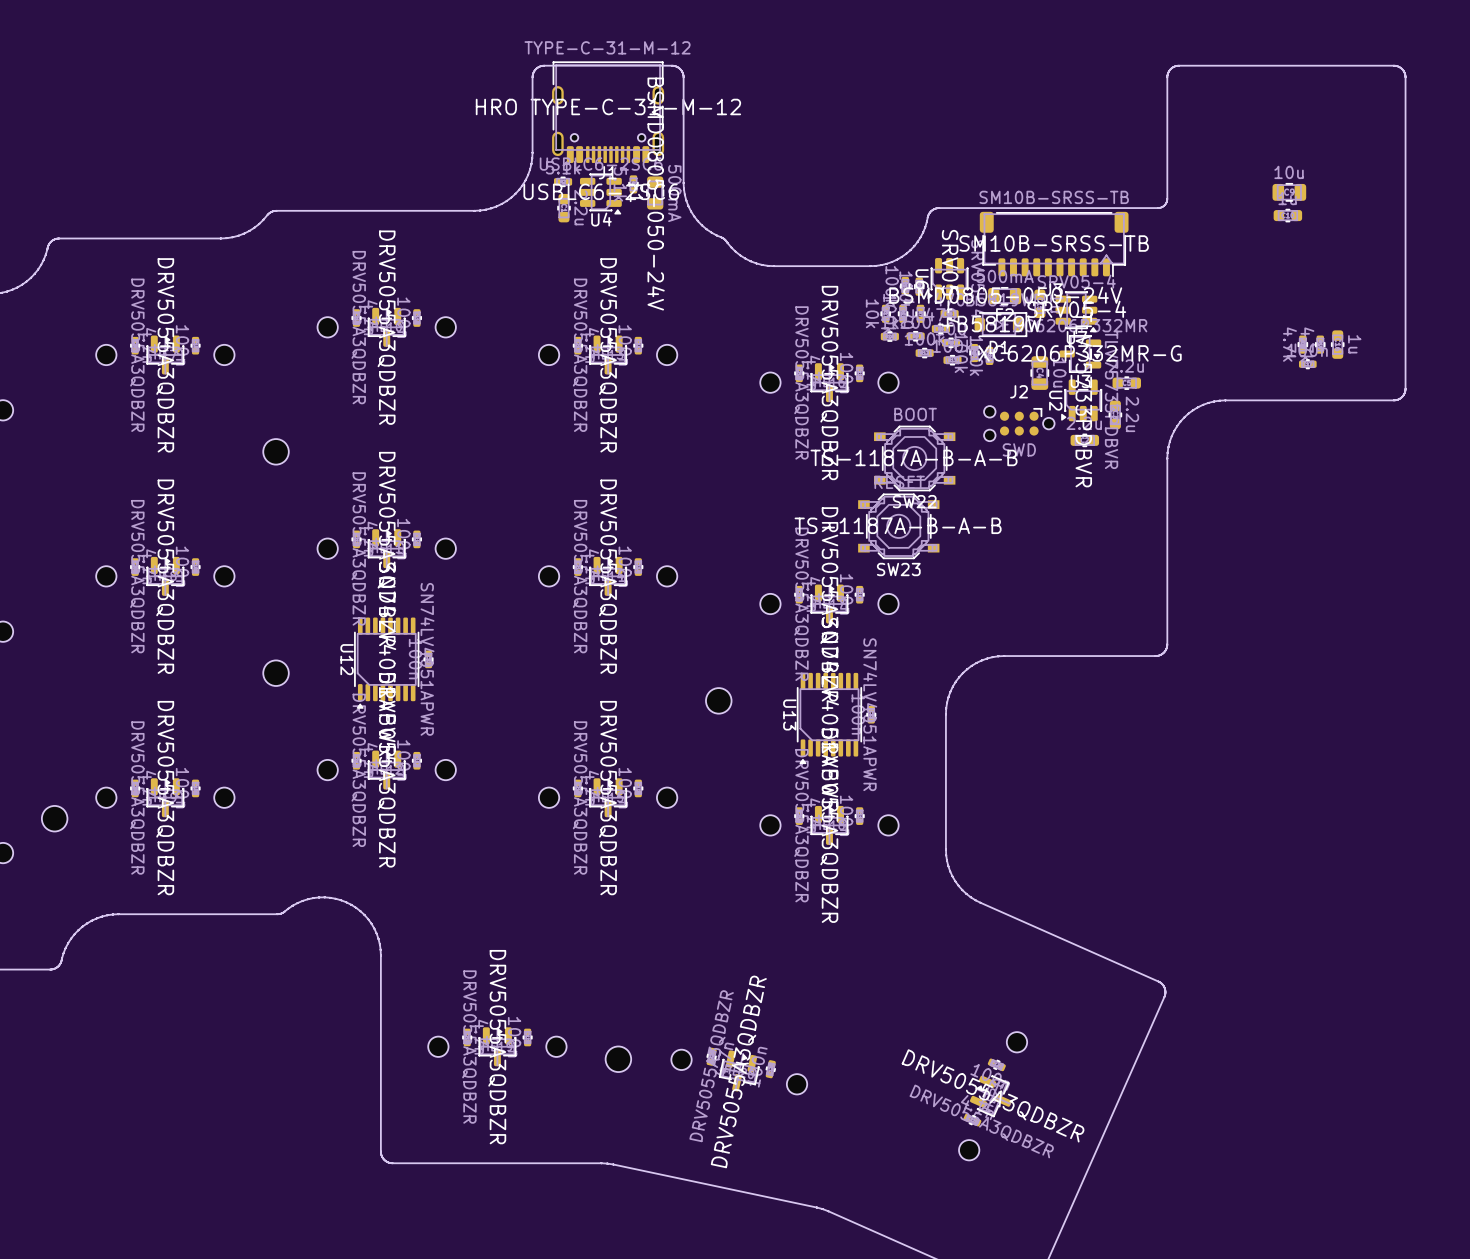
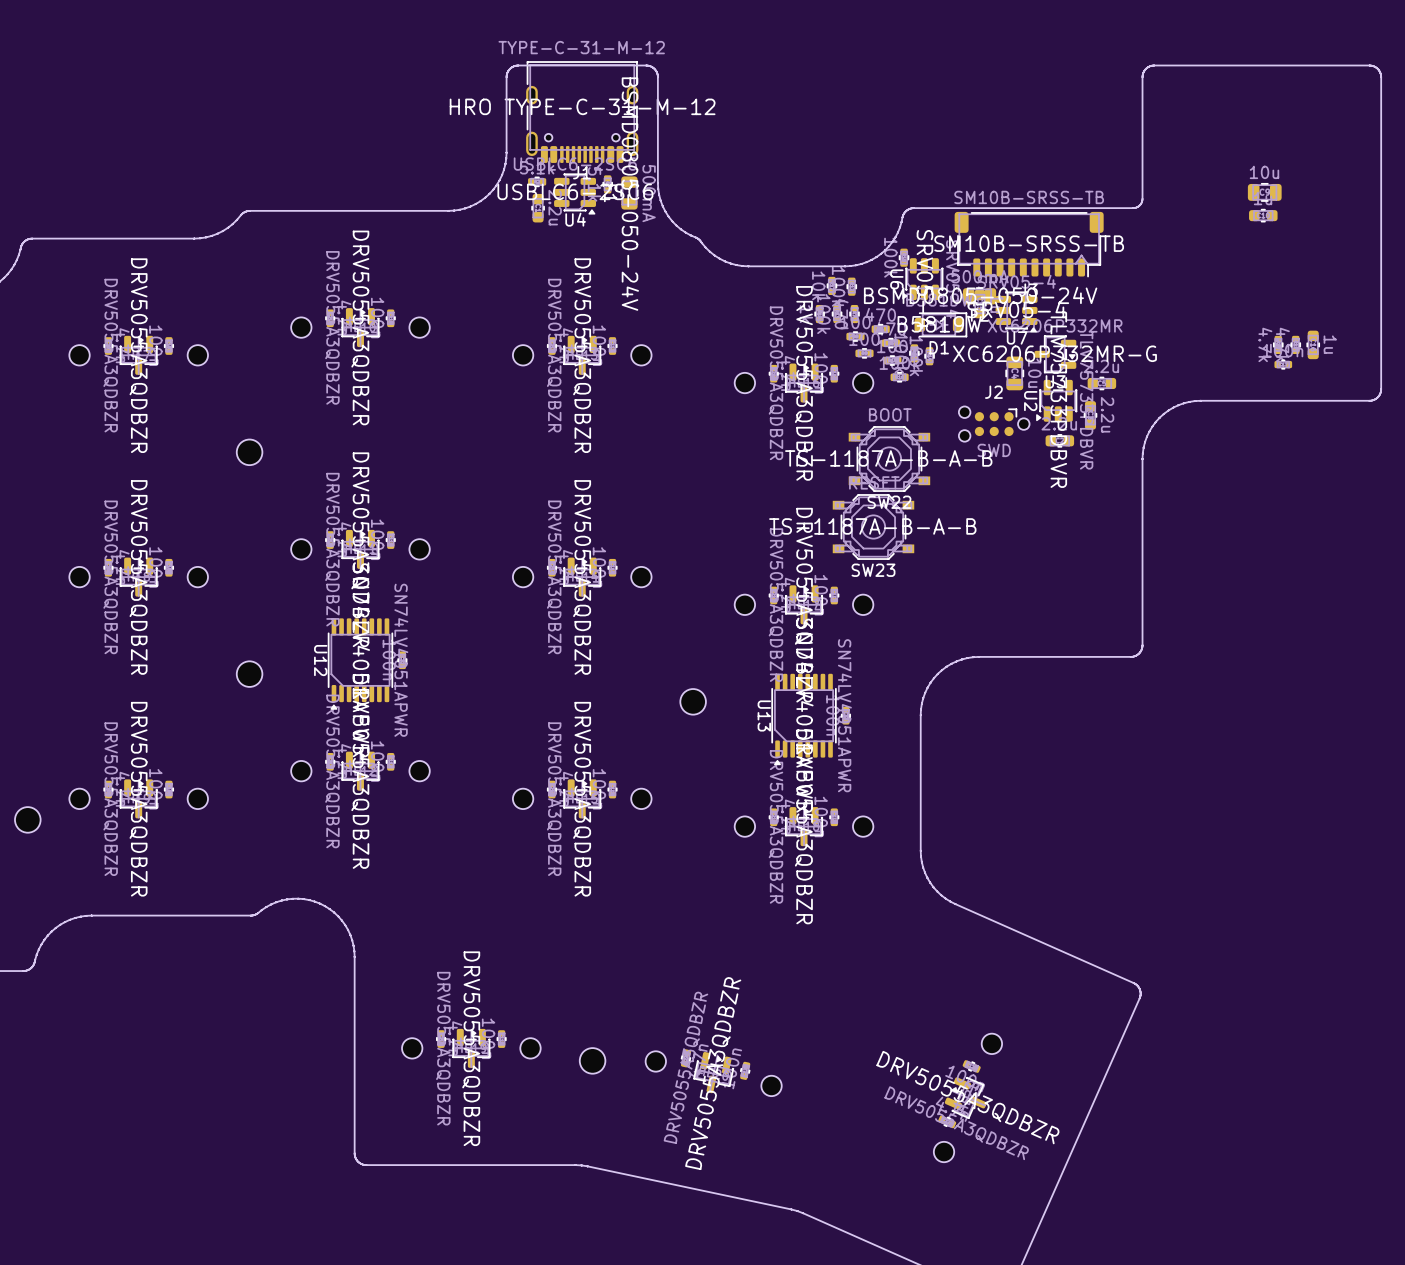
part position: (905, 285) -> (904, 257)
part rotation: 0° (919, 286) -> 90° clockwise (892, 360)
part position: (919, 286) -> (892, 360)
part position: (1039, 303) -> (979, 304)
U7 position: (1076, 311) -> (1016, 312)
part position: (885, 313) -> (831, 285)
part position: (903, 313) -> (914, 353)
part position: (920, 313) -> (854, 314)
part position: (949, 313) -> (880, 329)
D1 position: (1000, 324) -> (940, 324)
part position: (940, 328) -> (890, 343)
part rotation: 0° (889, 336) -> 90° clockwise (819, 314)
part position: (889, 336) -> (819, 314)
part position: (915, 336) -> (864, 353)
part position: (951, 342) -> (855, 336)
part rotation: 0° (924, 353) -> 90° clockwise (851, 286)
part position: (924, 353) -> (851, 286)
part position: (974, 353) -> (929, 356)
part rotation: 0° (989, 355) -> 90° clockwise (899, 377)
part position: (989, 355) -> (899, 377)
part rotation: 0° (952, 360) -> 90° clockwise (837, 314)
part position: (952, 360) -> (837, 314)

